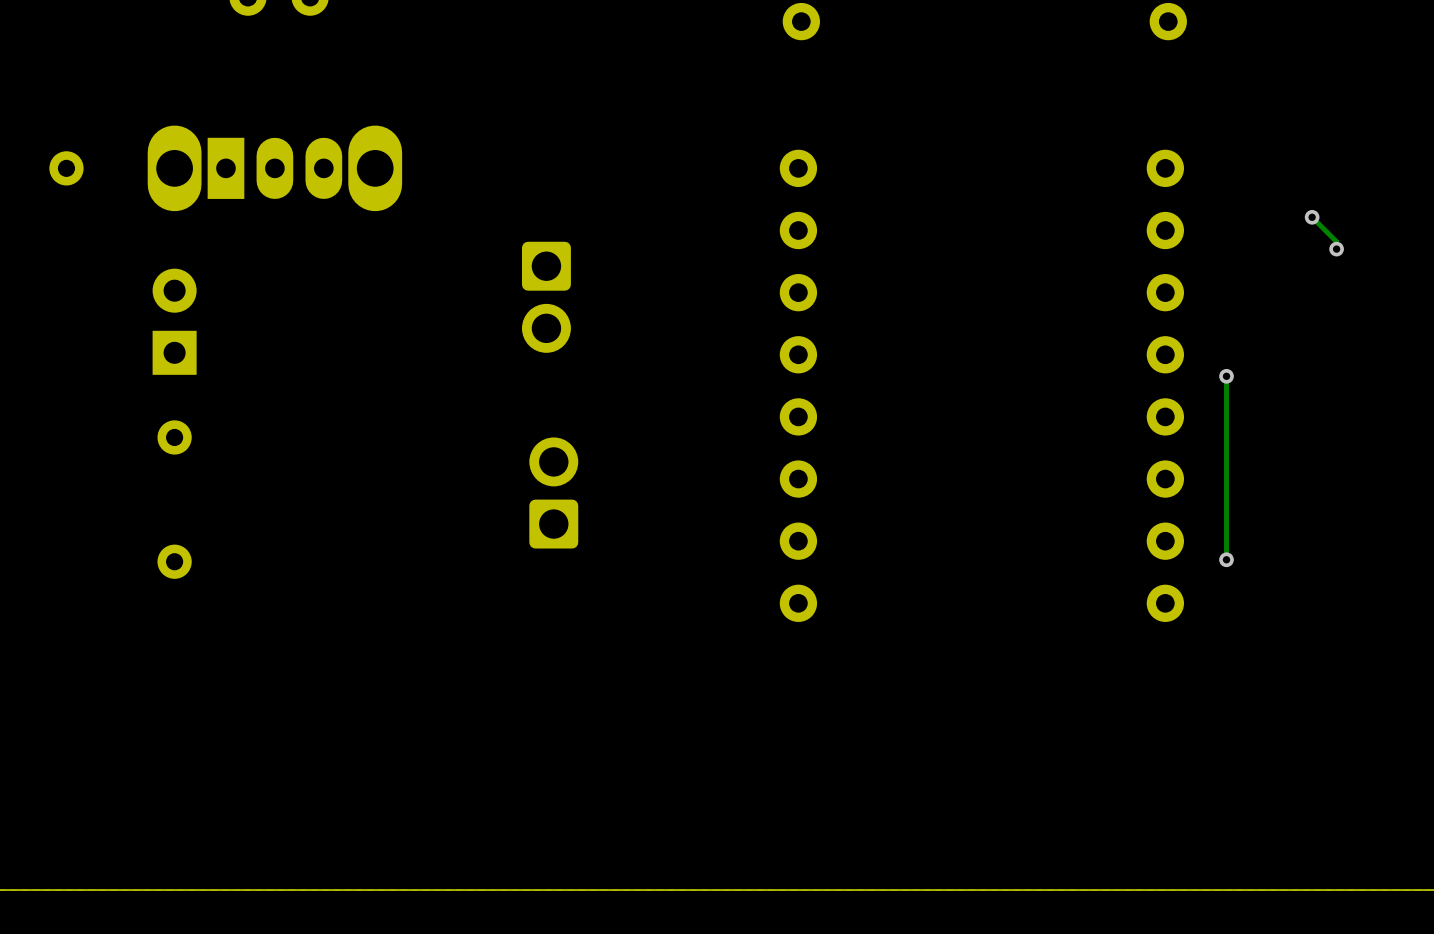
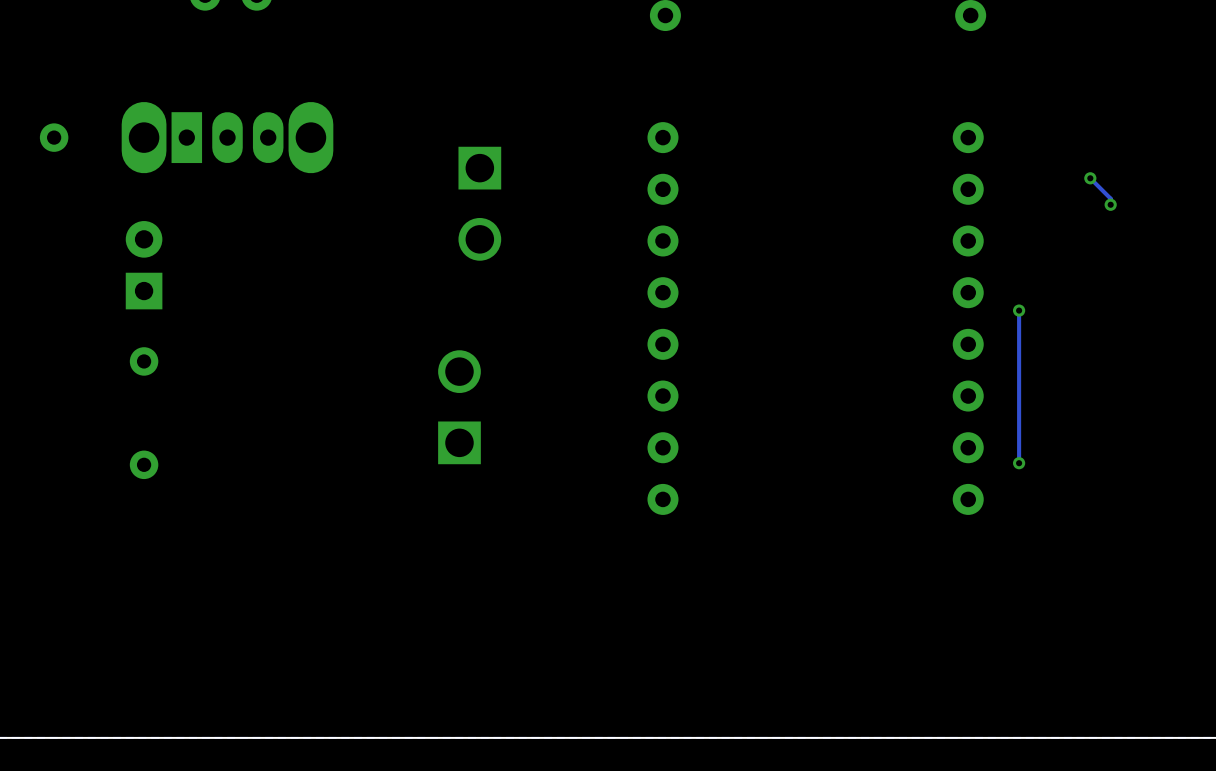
part: none -> (479, 203)
part: (546, 297) -> none
part footprint: [529, 437, 579, 549] -> [438, 350, 481, 465]

